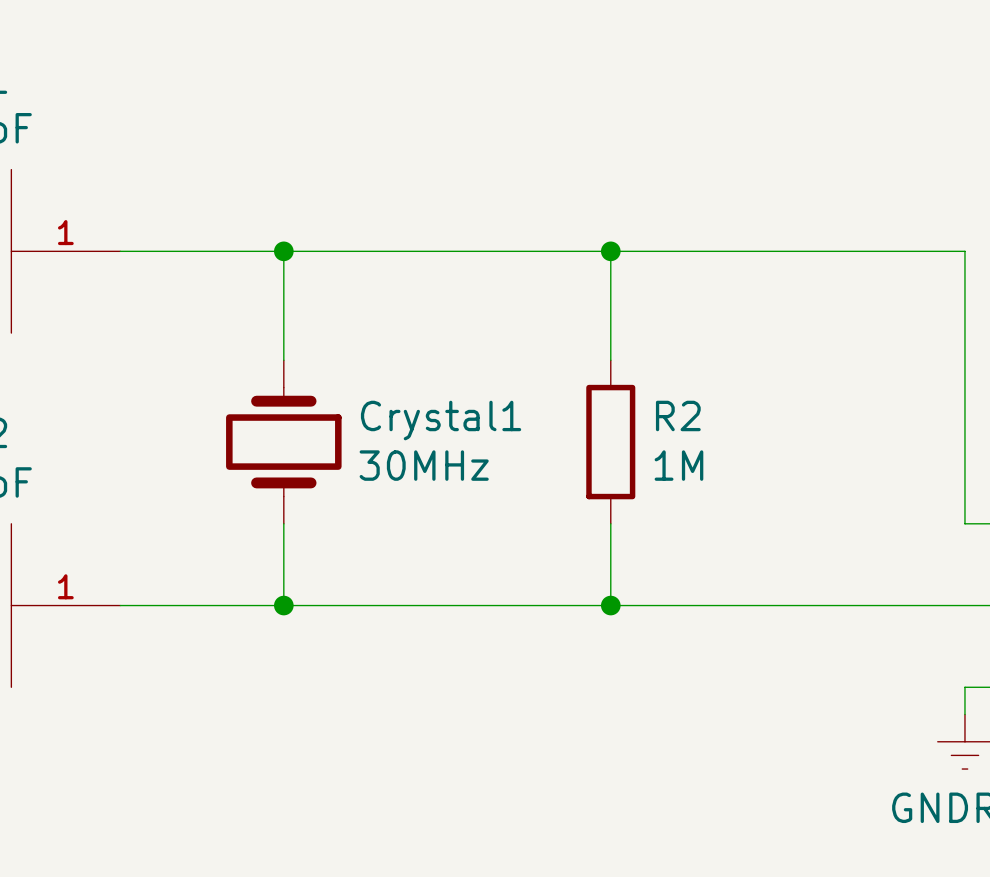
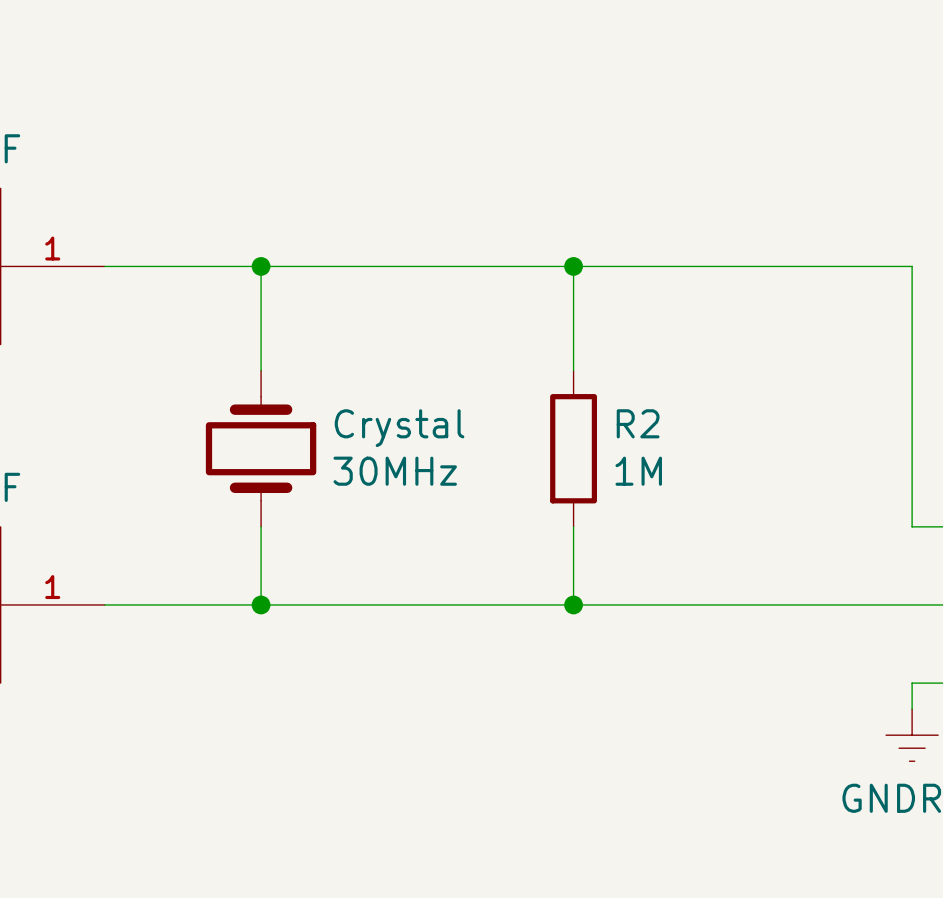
Crystal1 name: Crystal1 (441, 420) -> Crystal (399, 428)

